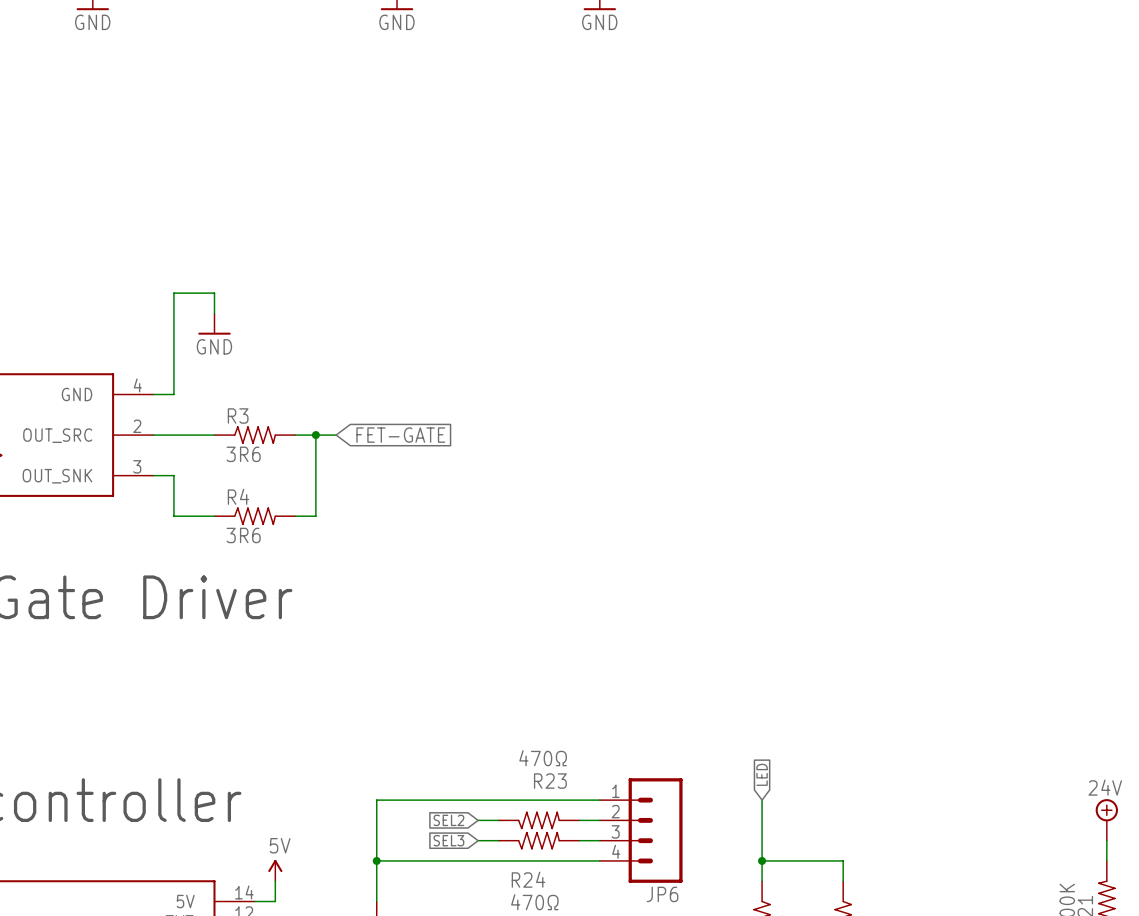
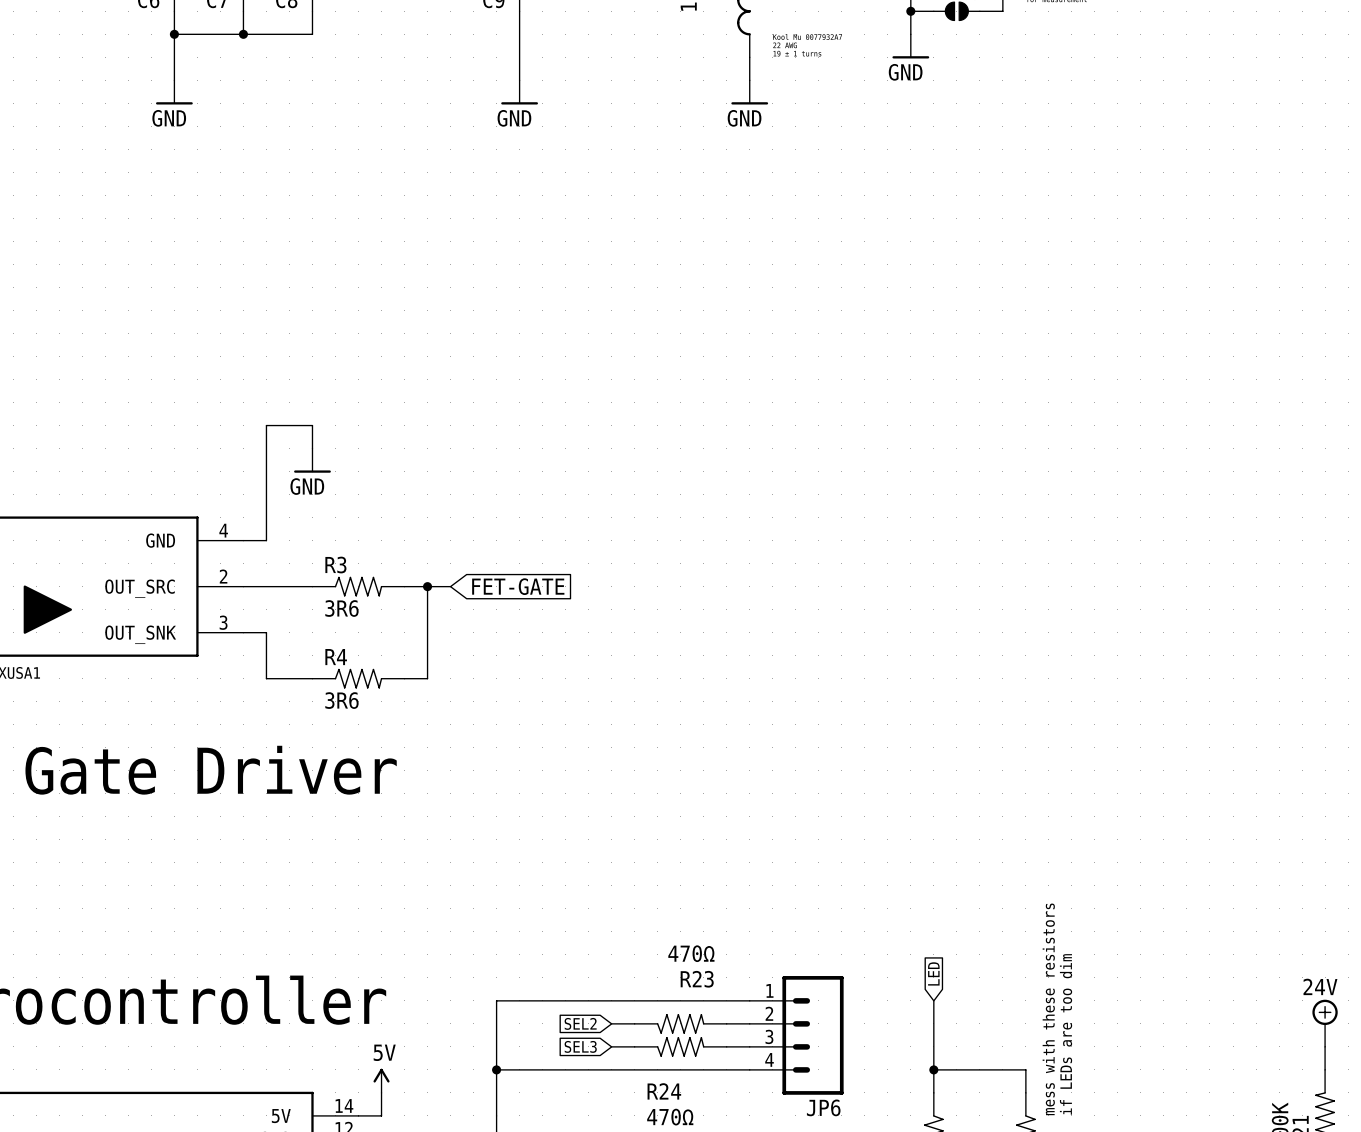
text: none -> mess with these resistors (1048, 1009)
text: none -> if LEDs are too dim (1066, 1034)

